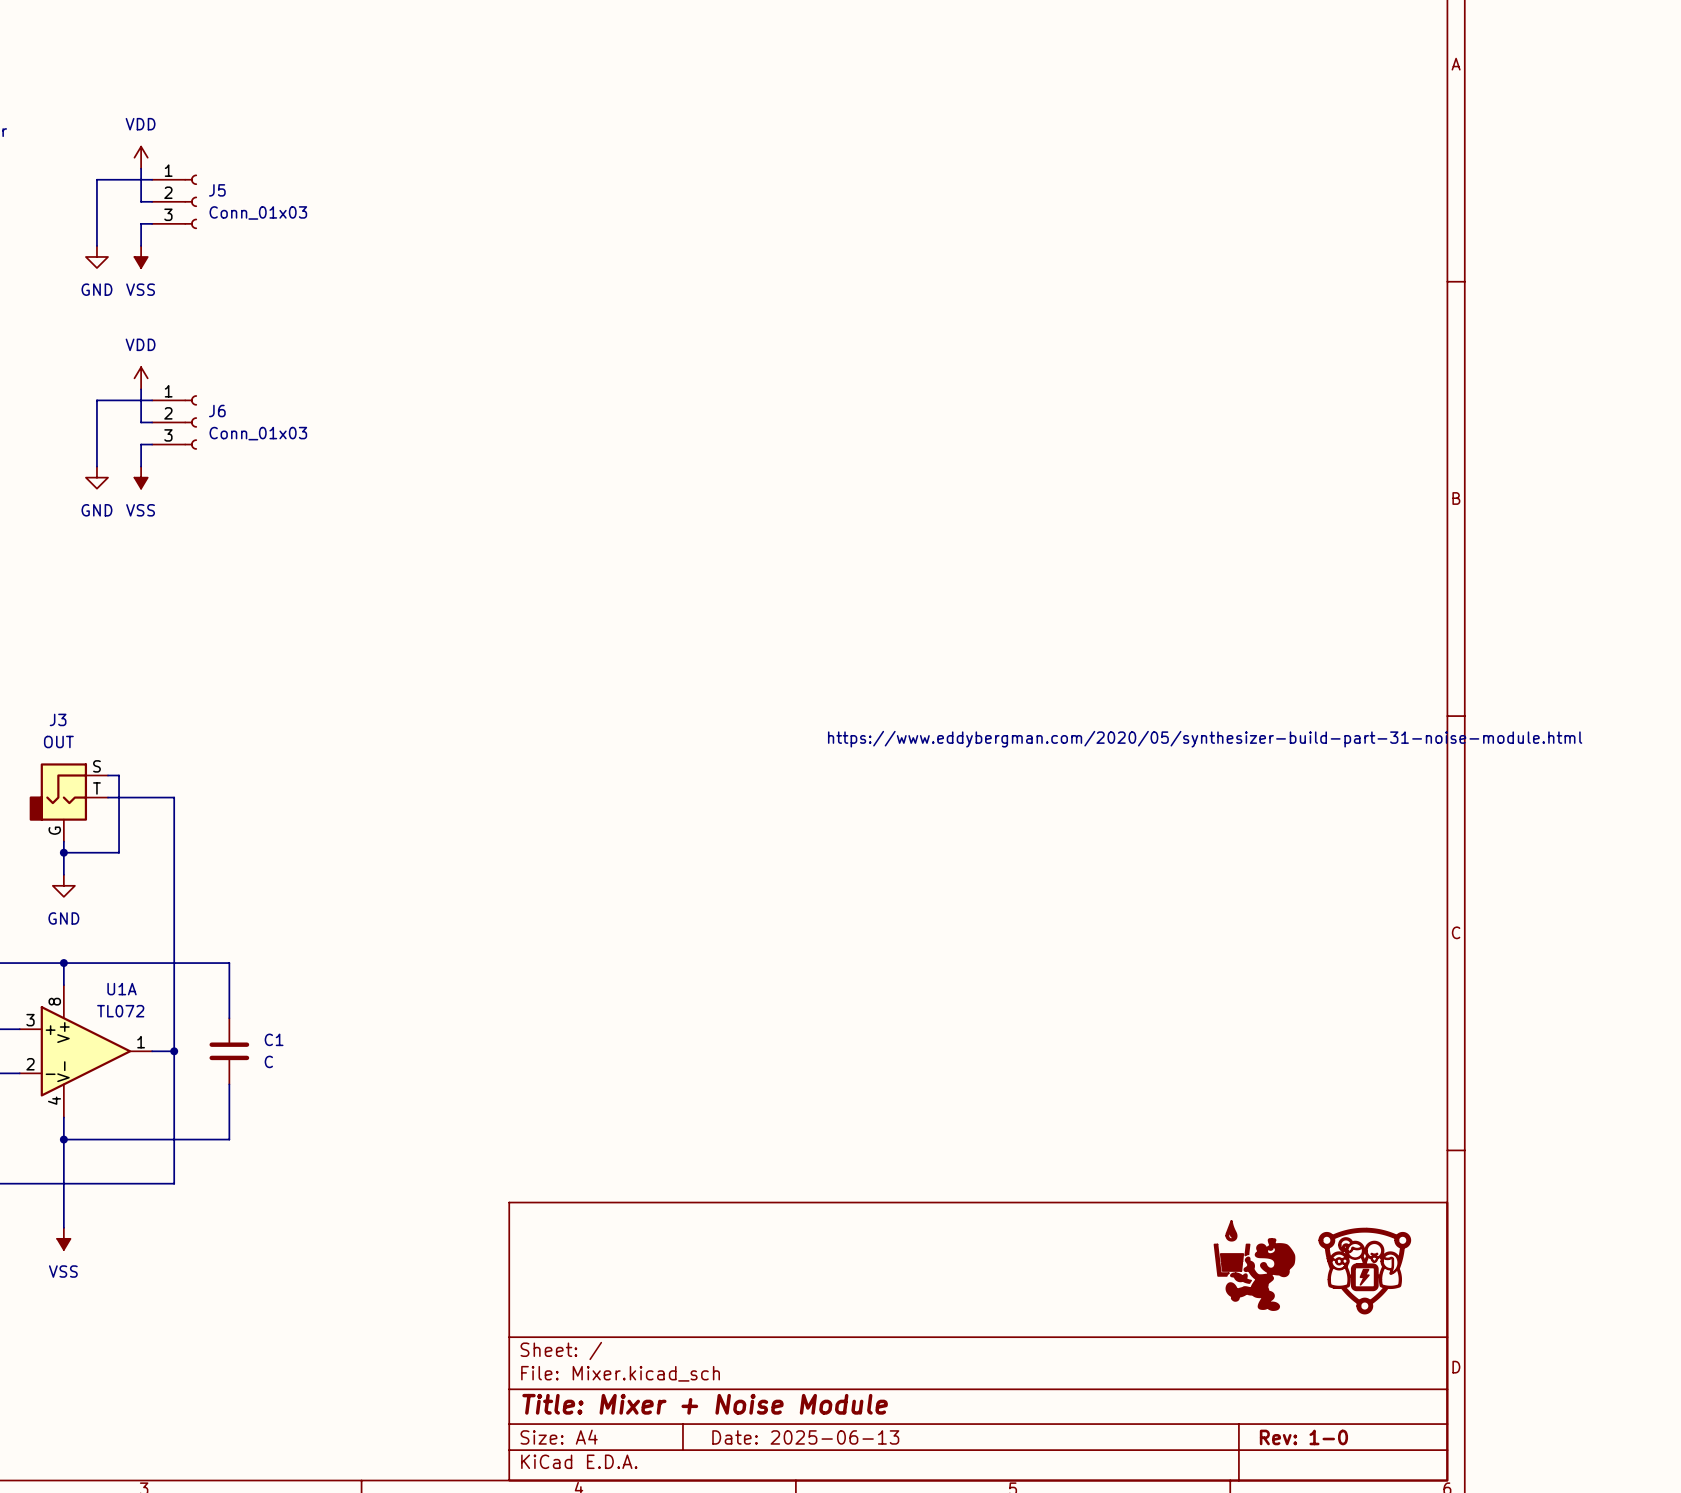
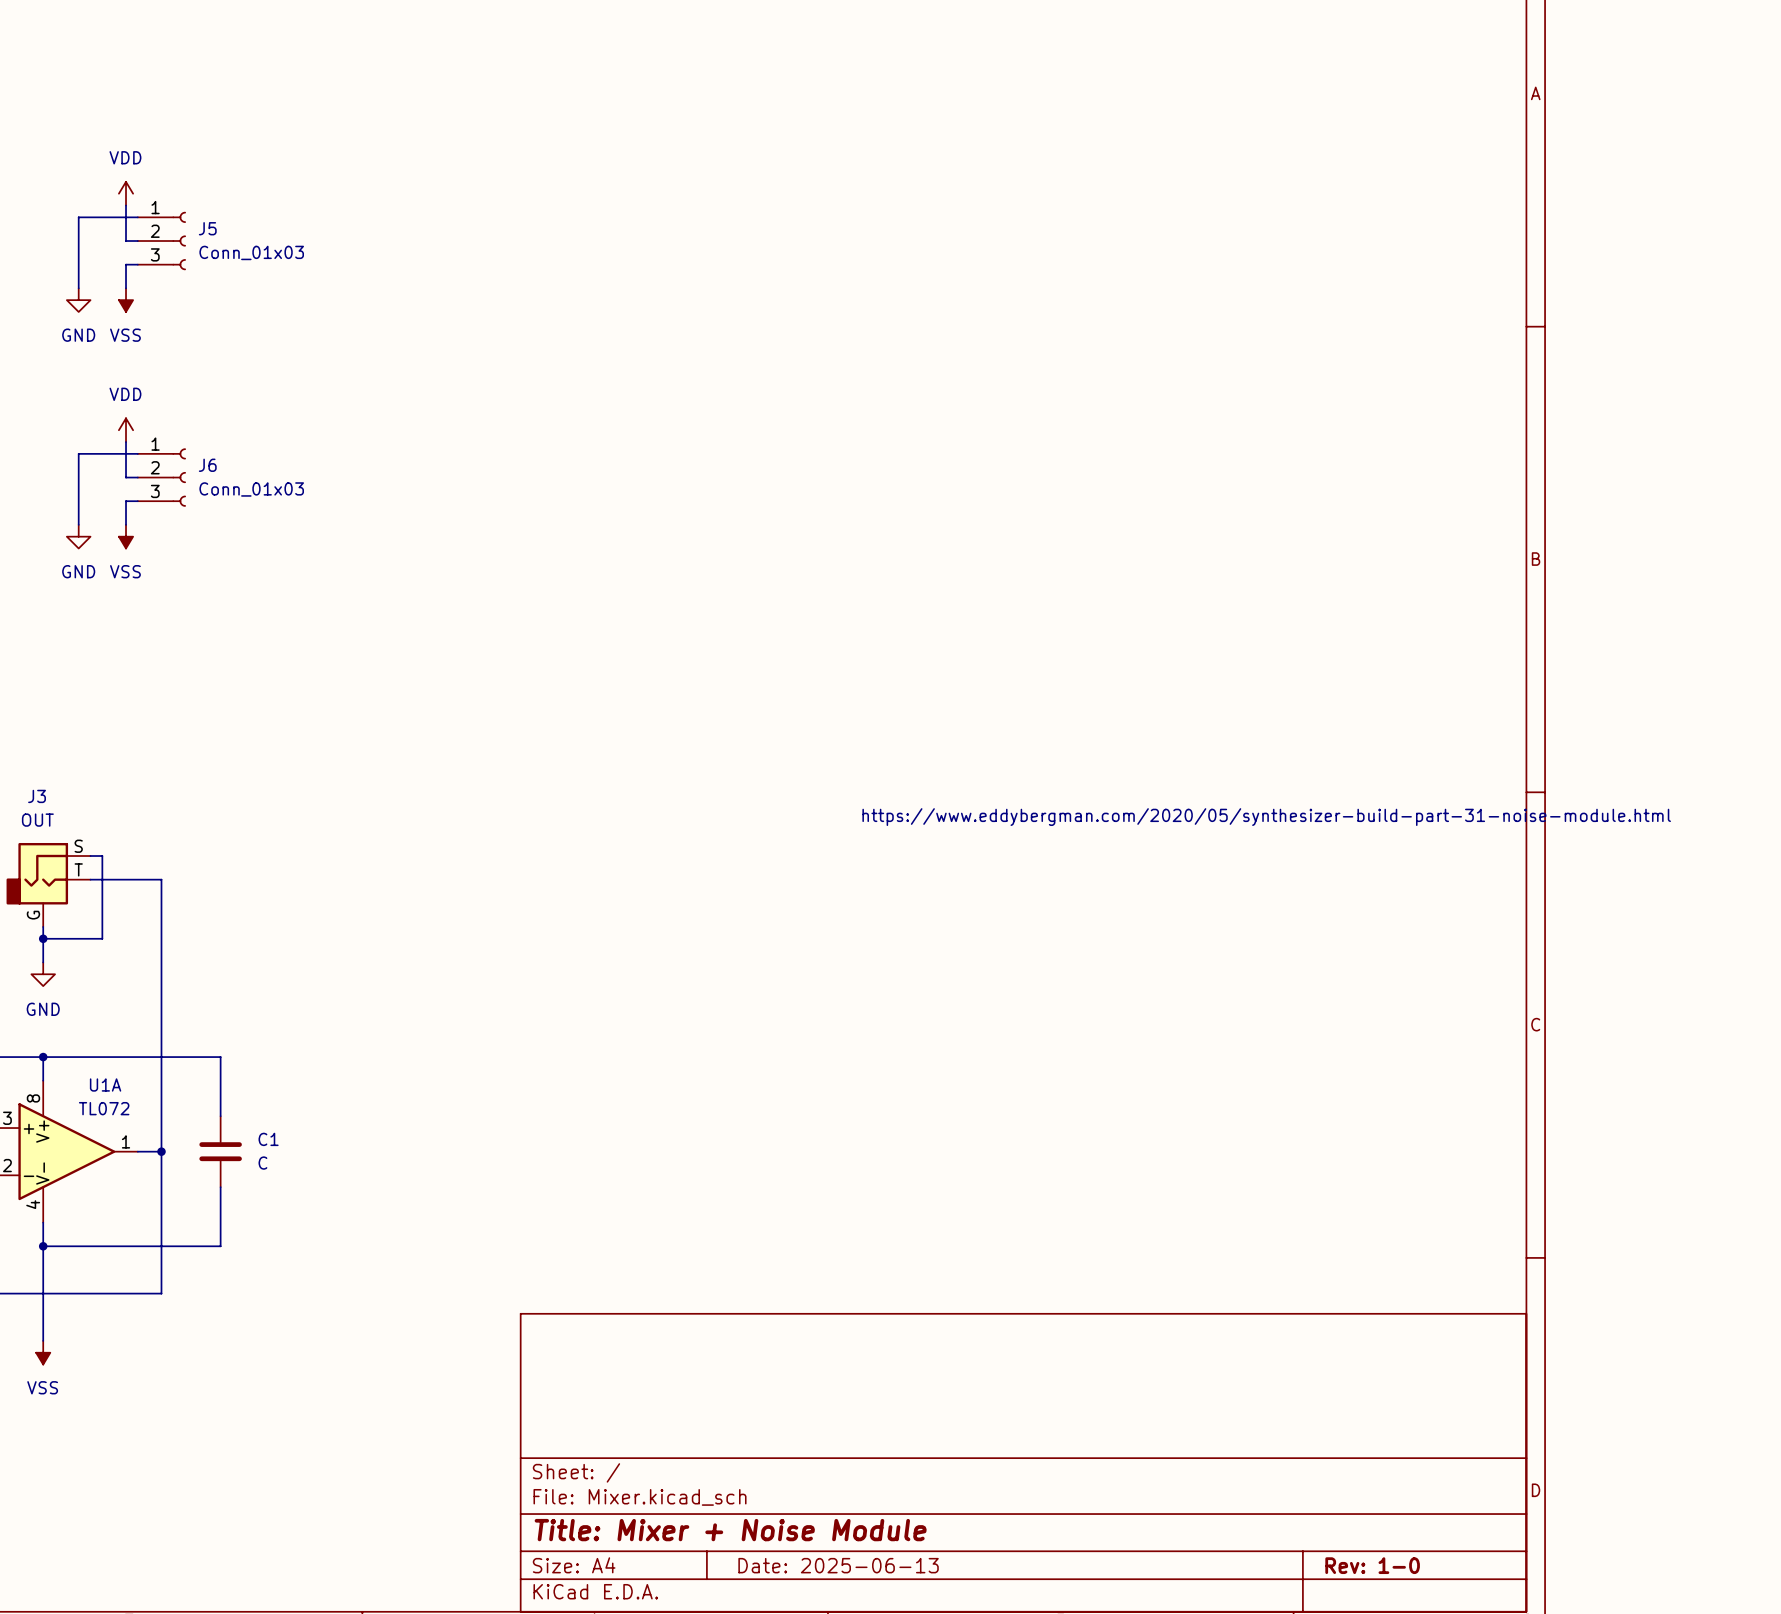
part: (1254, 1265) -> none
part: (1364, 1271) -> none

